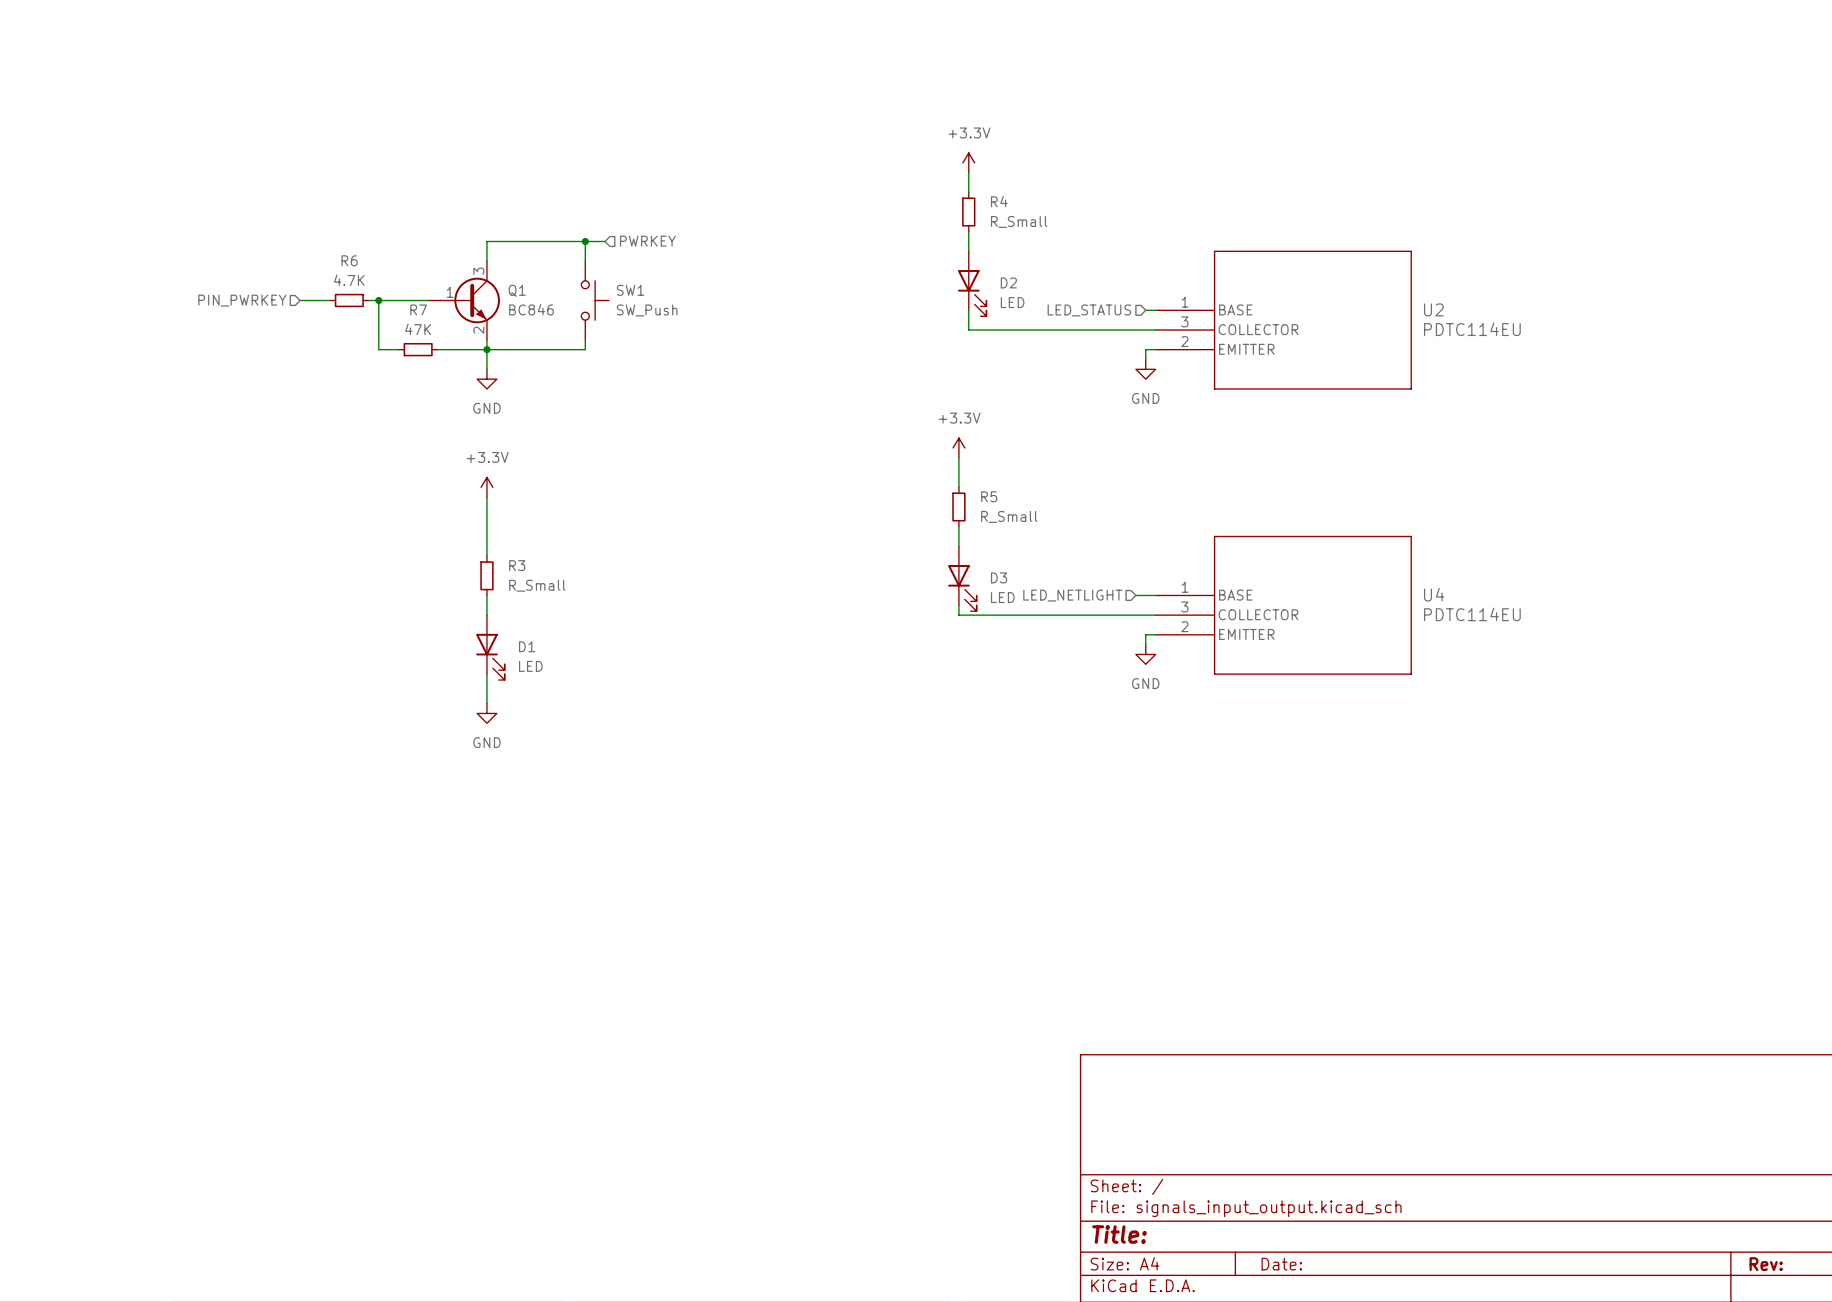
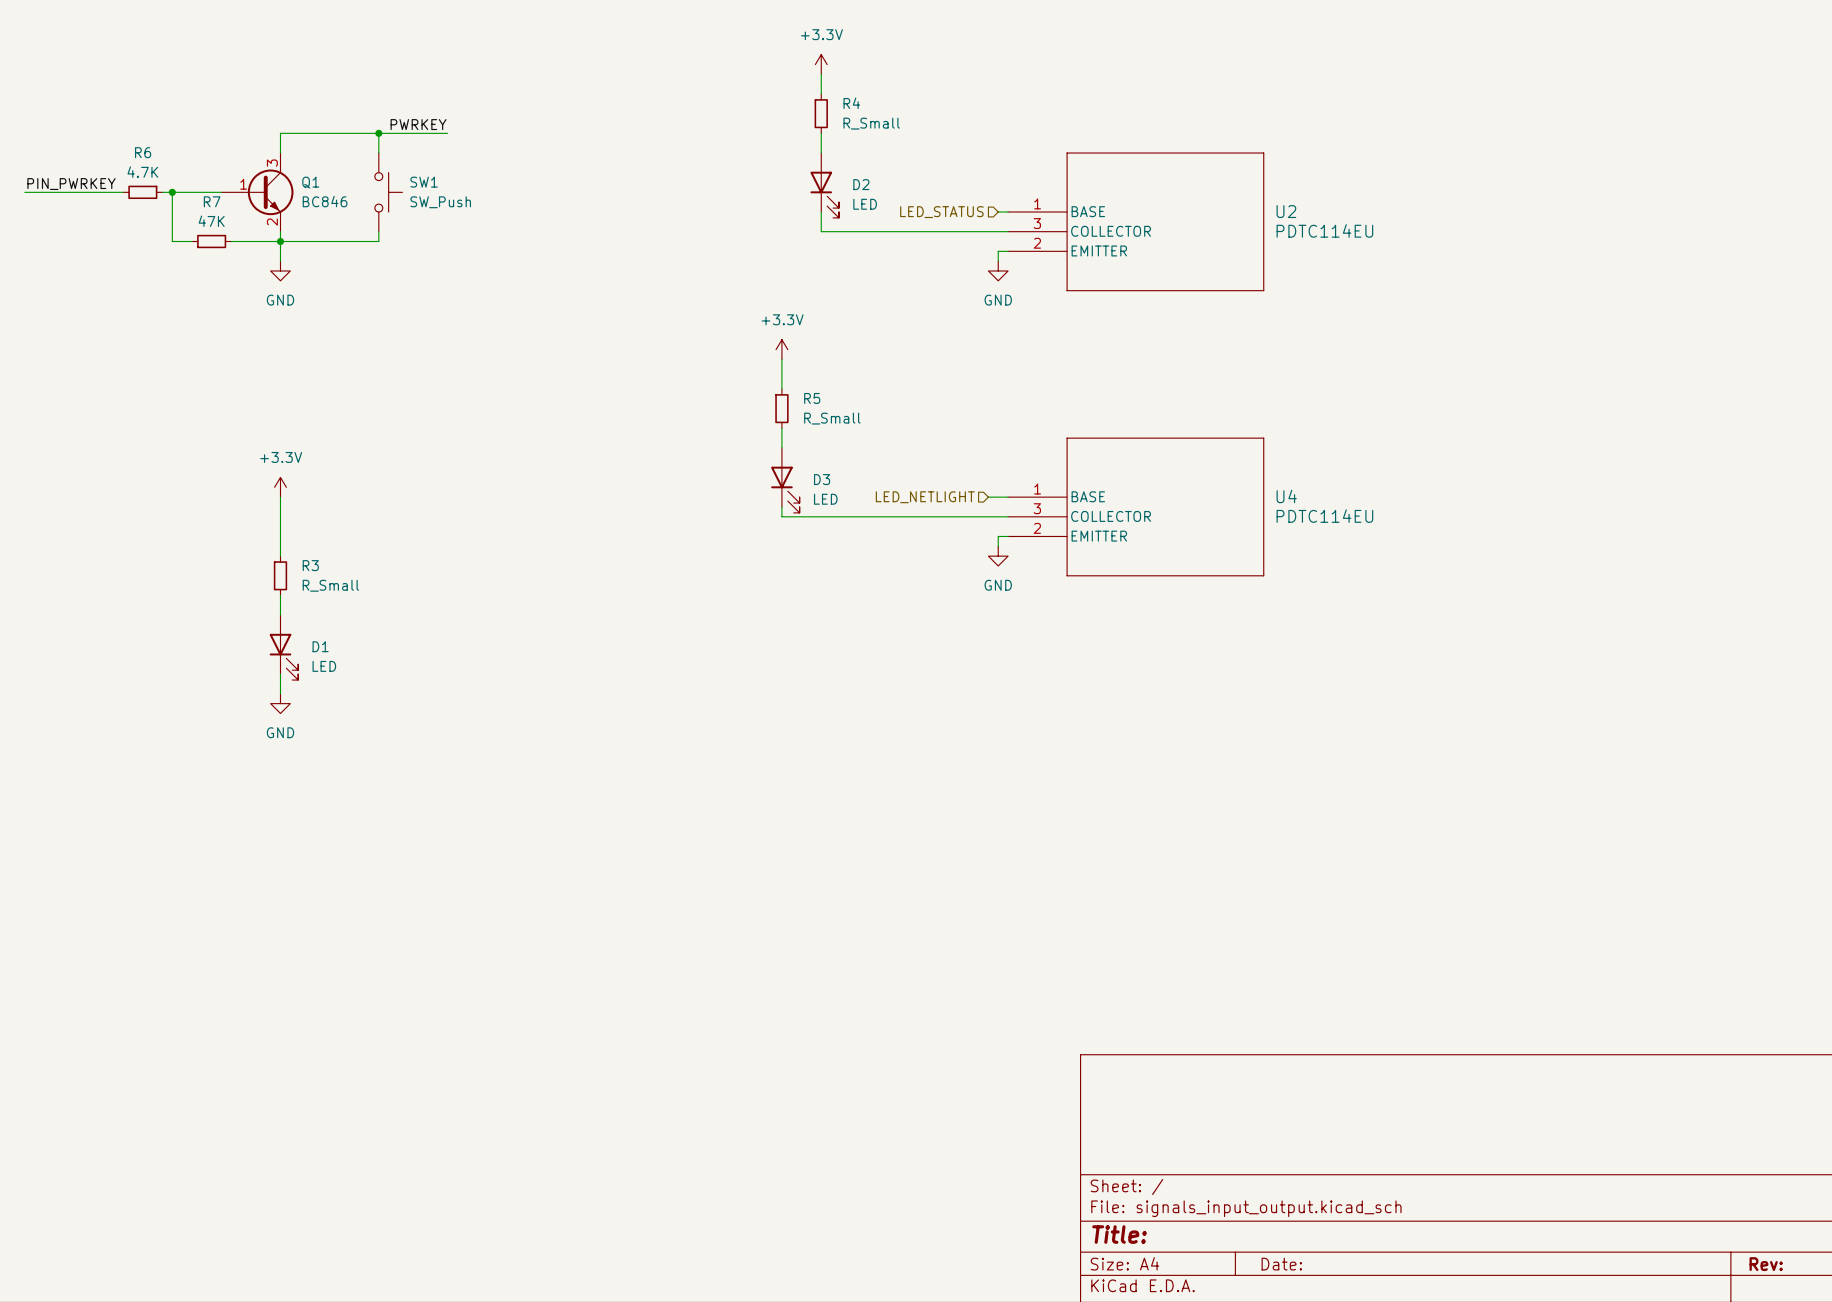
power symbol: none -> +3.3V (821, 64)
label: none -> PWRKEY (418, 124)
wire: none -> (378, 133) (378, 153)
junction: none -> (378, 133)
wire: none -> (447, 133) (280, 133) (280, 153)
power symbol: +3.3V (968, 162) -> none
wire: (968, 172) (968, 192) -> (821, 74) (821, 94)
label: none -> PIN_PWRKEY (71, 184)
wire: none -> (24, 192) (123, 192)
wire: none -> (162, 192) (221, 192)
wire: none -> (172, 192) (172, 241) (191, 241)
junction: none -> (172, 192)
R4 position: (968, 212) -> (821, 113)
wire: none -> (280, 231) (280, 261)
wire: none -> (378, 231) (378, 241) (231, 241)
wire: (968, 231) (968, 251) -> (821, 133) (821, 153)
junction: none -> (280, 241)
wire: (585, 241) (585, 261) -> none
junction: (585, 241) -> none
wire: (604, 241) (486, 241) (486, 261) -> none
hierarchical label: PWRKEY (647, 241) -> none
power symbol: none -> GND (280, 271)
power symbol: none -> GND (998, 271)
D2 position: (972, 283) -> (824, 185)
hierarchical label: PIN_PWRKEY (242, 300) -> none
wire: (300, 300) (329, 300) -> none
R6 position: (349, 300) -> (142, 192)
wire: (368, 300) (427, 300) -> none
wire: (378, 300) (378, 349) (398, 349) -> none
junction: (378, 300) -> none
Q1 position: (463, 300) -> (257, 192)
SW1 position: (595, 300) -> (388, 192)
wire: (968, 310) (968, 329) (1155, 329) -> (821, 212) (821, 231) (1008, 231)
hierarchical label position: LED_STATUS (1089, 310) -> LED_STATUS (941, 212)
wire: (1145, 310) (1155, 310) -> (998, 212) (1008, 212)
U2 position: (1283, 320) -> (1136, 221)
wire: (486, 339) (486, 369) -> none
wire: (585, 339) (585, 349) (437, 349) -> none
R7 position: (418, 349) -> (211, 241)
junction: (486, 349) -> none
power symbol: none -> +3.3V (781, 349)
wire: (1155, 349) (1145, 349) (1145, 359) -> (1008, 251) (998, 251) (998, 261)
wire: none -> (781, 359) (781, 388)
power symbol: GND (1145, 369) -> none
power symbol: GND (486, 379) -> none
wire: none -> (781, 428) (781, 447)
power symbol: +3.3V (958, 447) -> none
wire: (958, 457) (958, 487) -> none
power symbol: none -> +3.3V (280, 487)
power symbol: +3.3V (486, 487) -> none
wire: none -> (280, 497) (280, 556)
wire: (486, 497) (486, 556) -> none
wire: none -> (781, 506) (781, 516) (1008, 516)
R5 position: (958, 506) -> (781, 408)
wire: (958, 526) (958, 546) -> none
power symbol: none -> GND (998, 556)
R3 position: (486, 575) -> (280, 575)
D3 position: (962, 578) -> (785, 480)
wire: none -> (280, 595) (280, 615)
wire: (486, 595) (486, 615) -> none
hierarchical label position: LED_NETLIGHT (1072, 595) -> LED_NETLIGHT (925, 497)
wire: (1135, 595) (1155, 595) -> (988, 497) (1008, 497)
wire: (958, 605) (958, 615) (1155, 615) -> none
U4 position: (1283, 605) -> (1136, 506)
wire: (1155, 634) (1145, 634) (1145, 644) -> (1008, 536) (998, 536) (998, 546)
D1 position: (490, 647) -> (283, 647)
power symbol: GND (1145, 654) -> none
wire: none -> (280, 674) (280, 693)
wire: (486, 674) (486, 703) -> none
power symbol: none -> GND (280, 703)
power symbol: GND (486, 713) -> none

